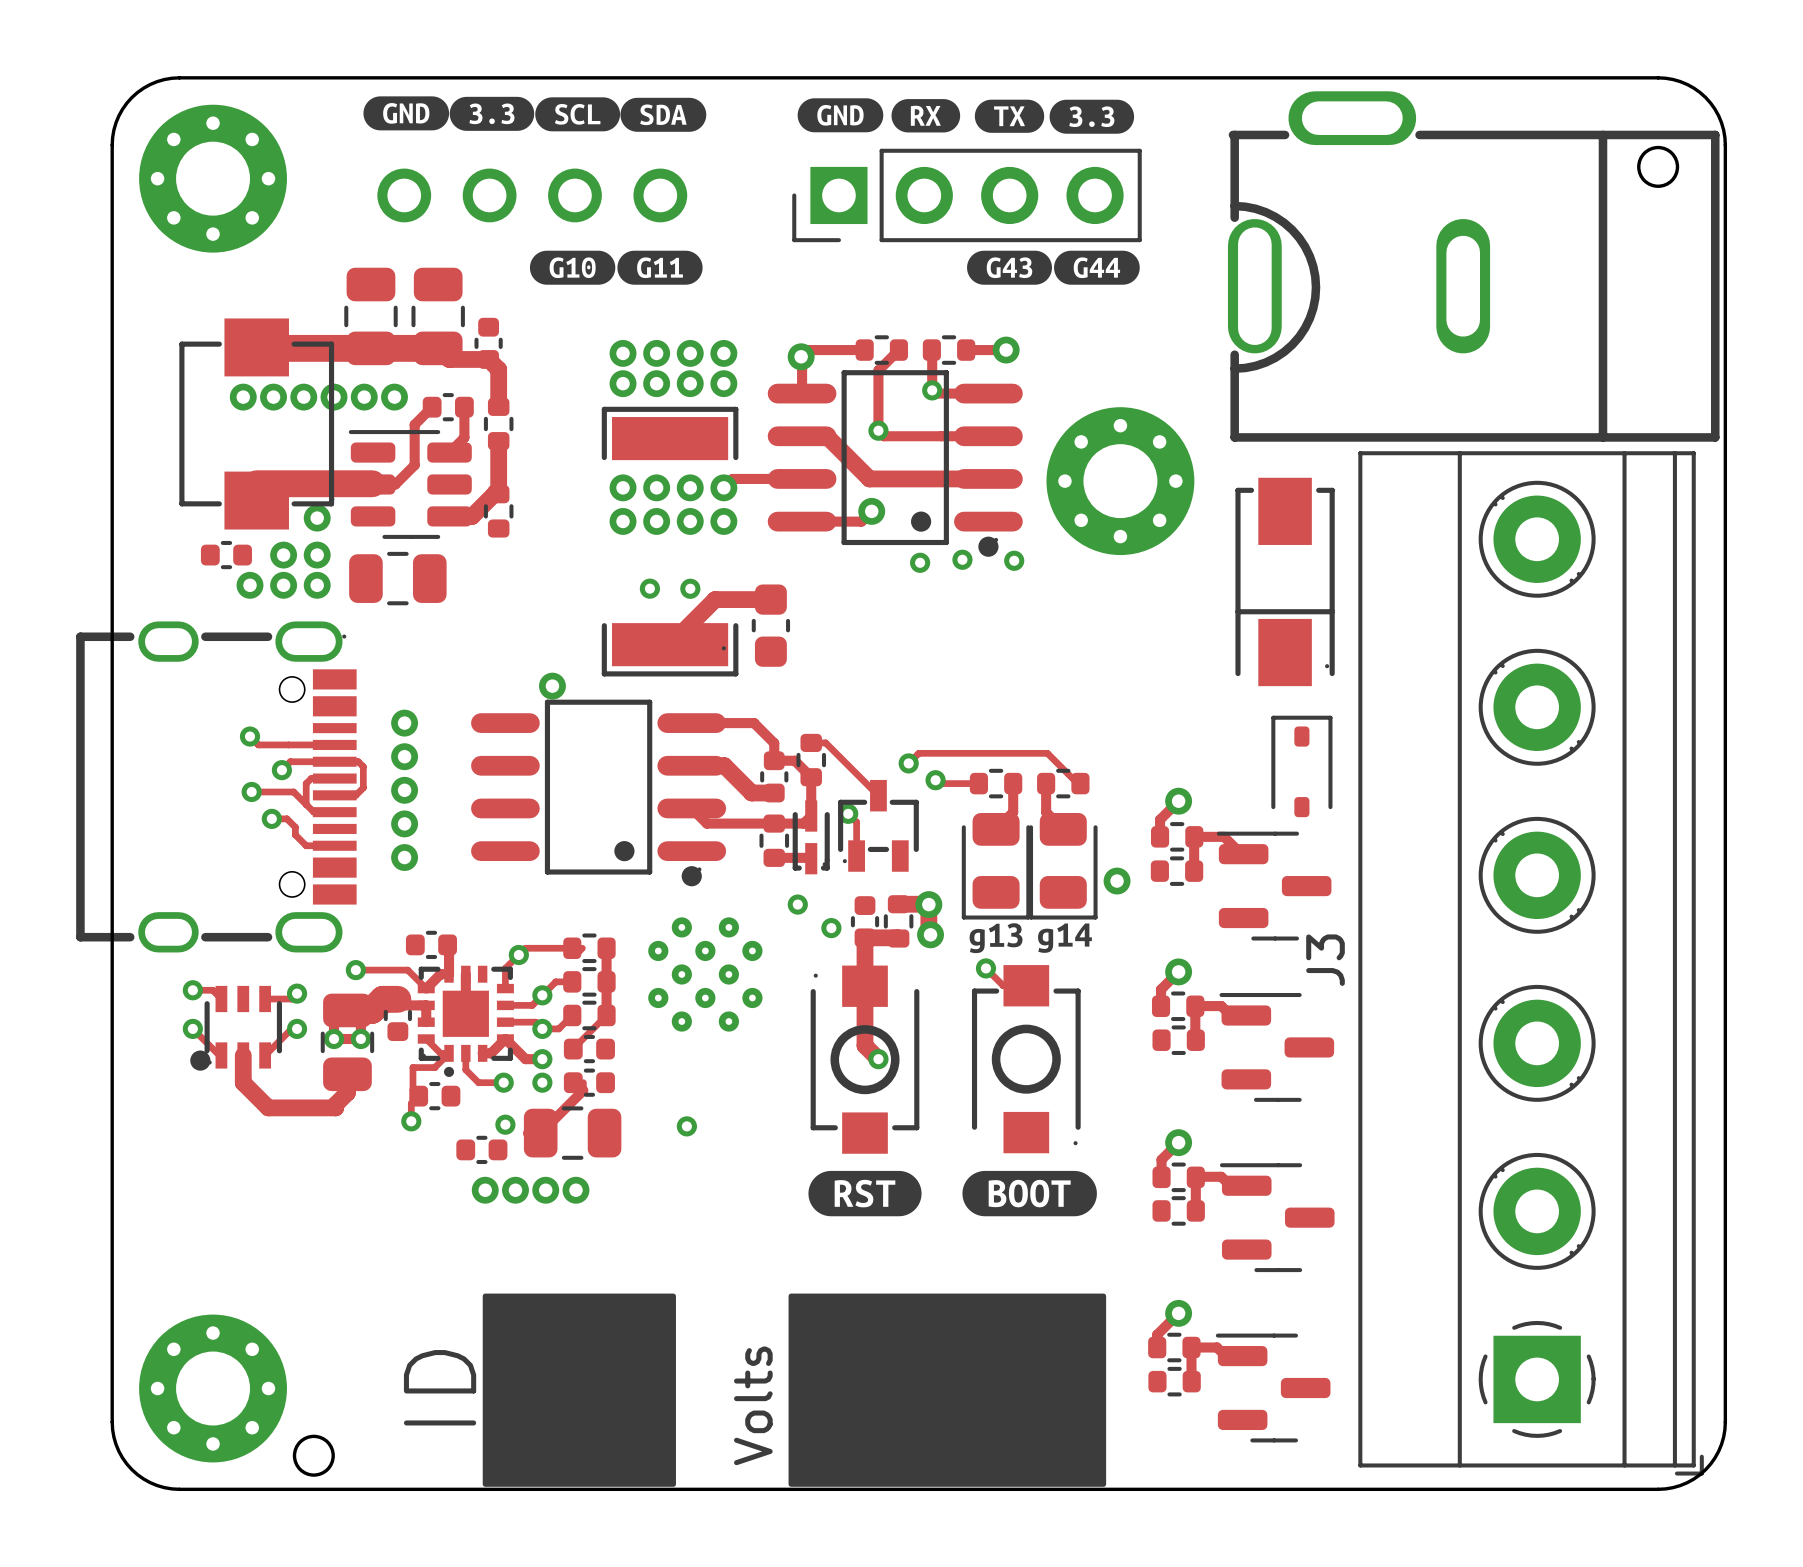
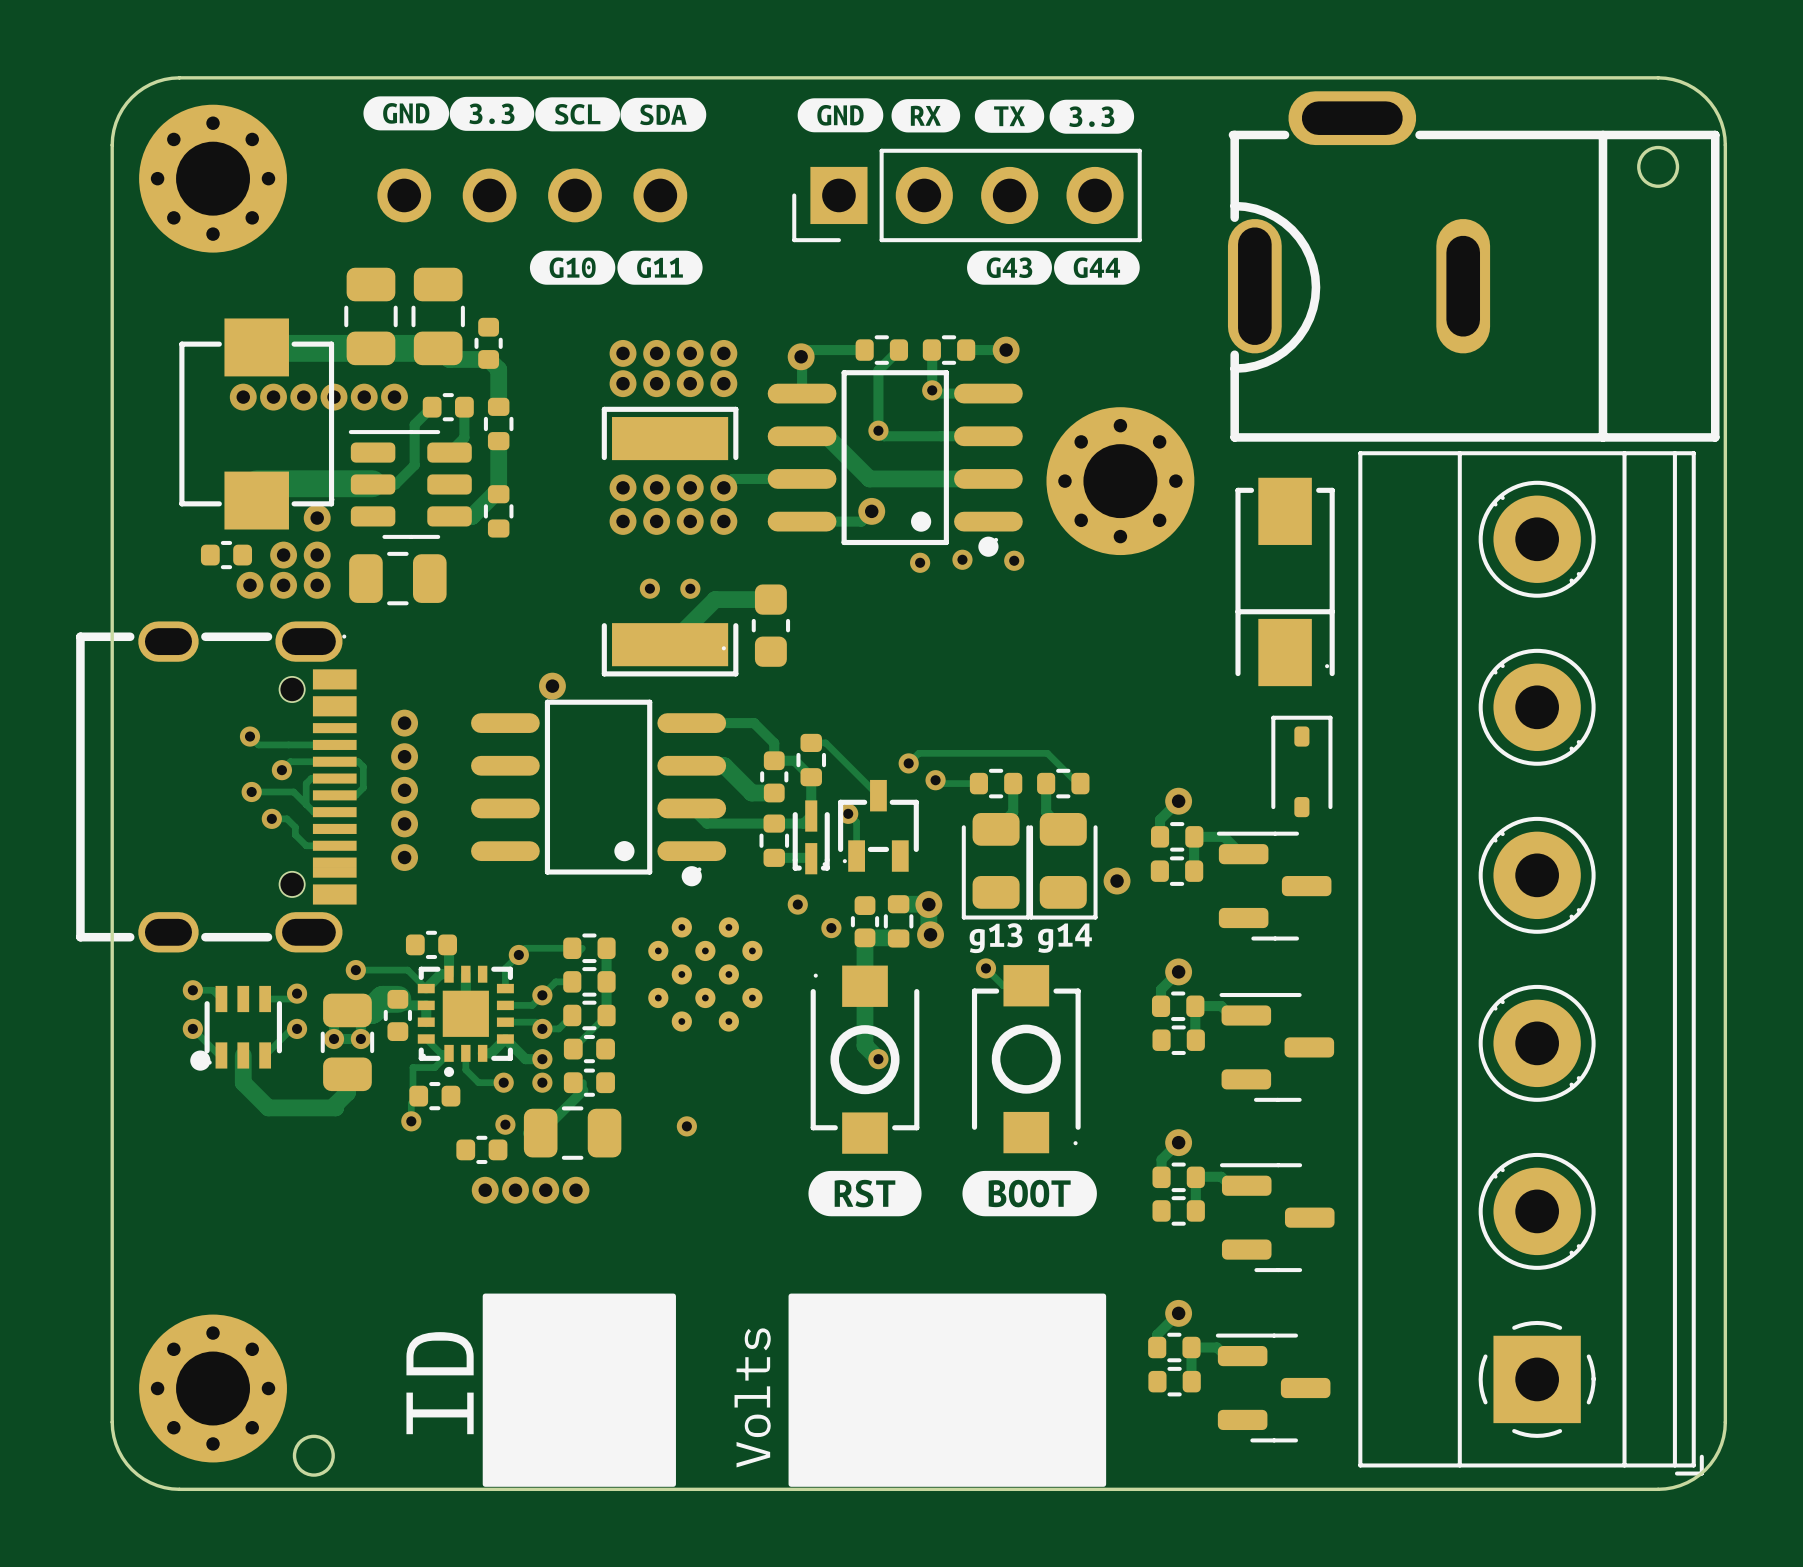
J3 name: J3 (1325, 960) -> none

